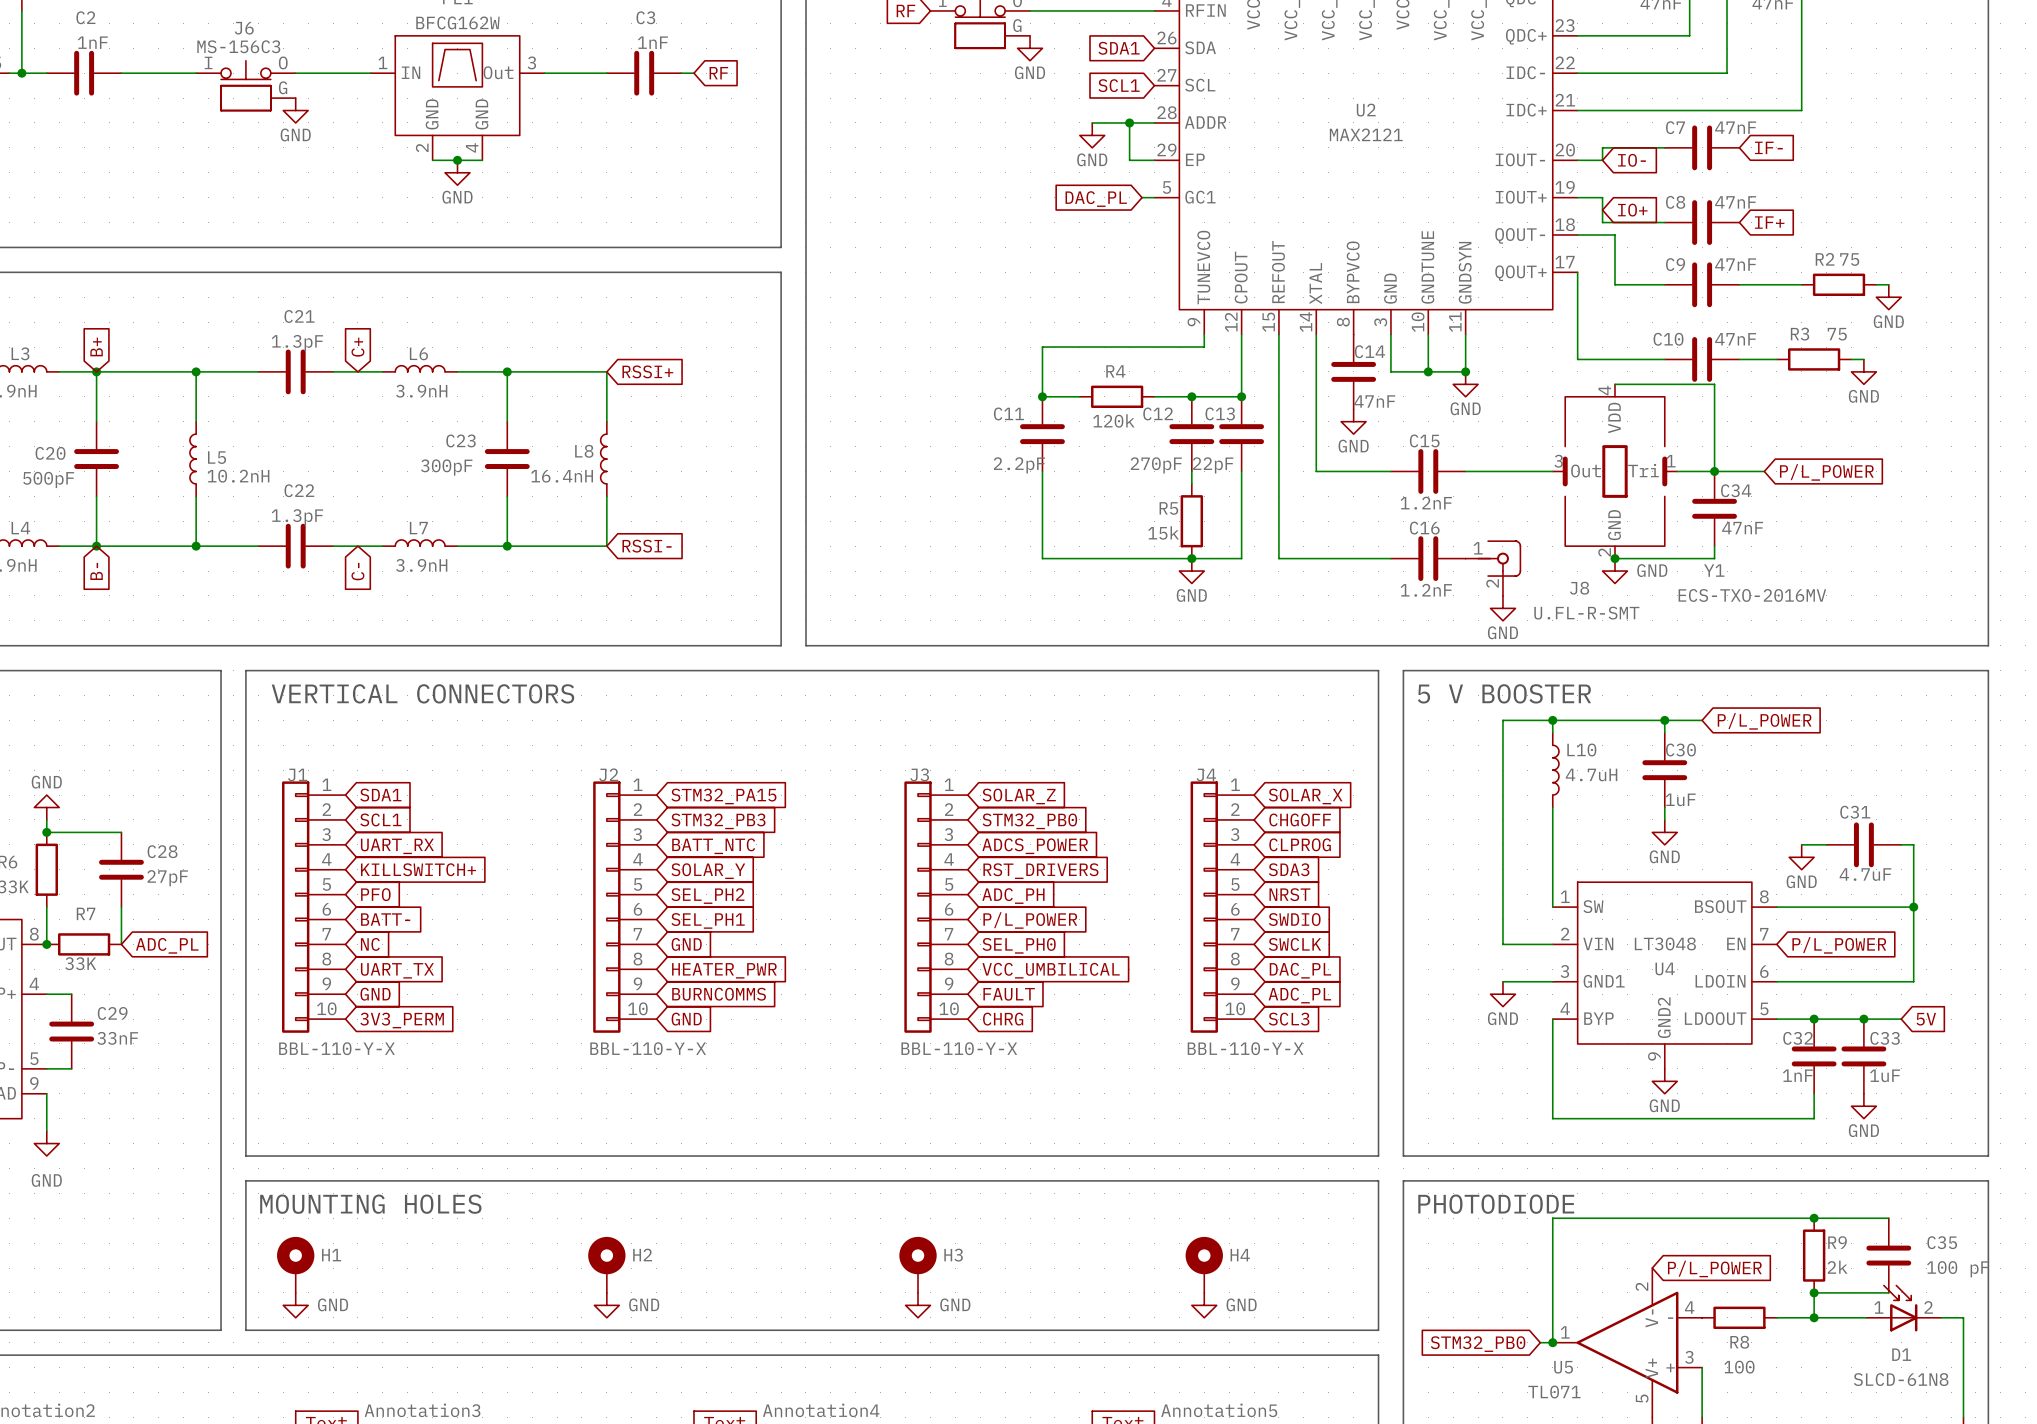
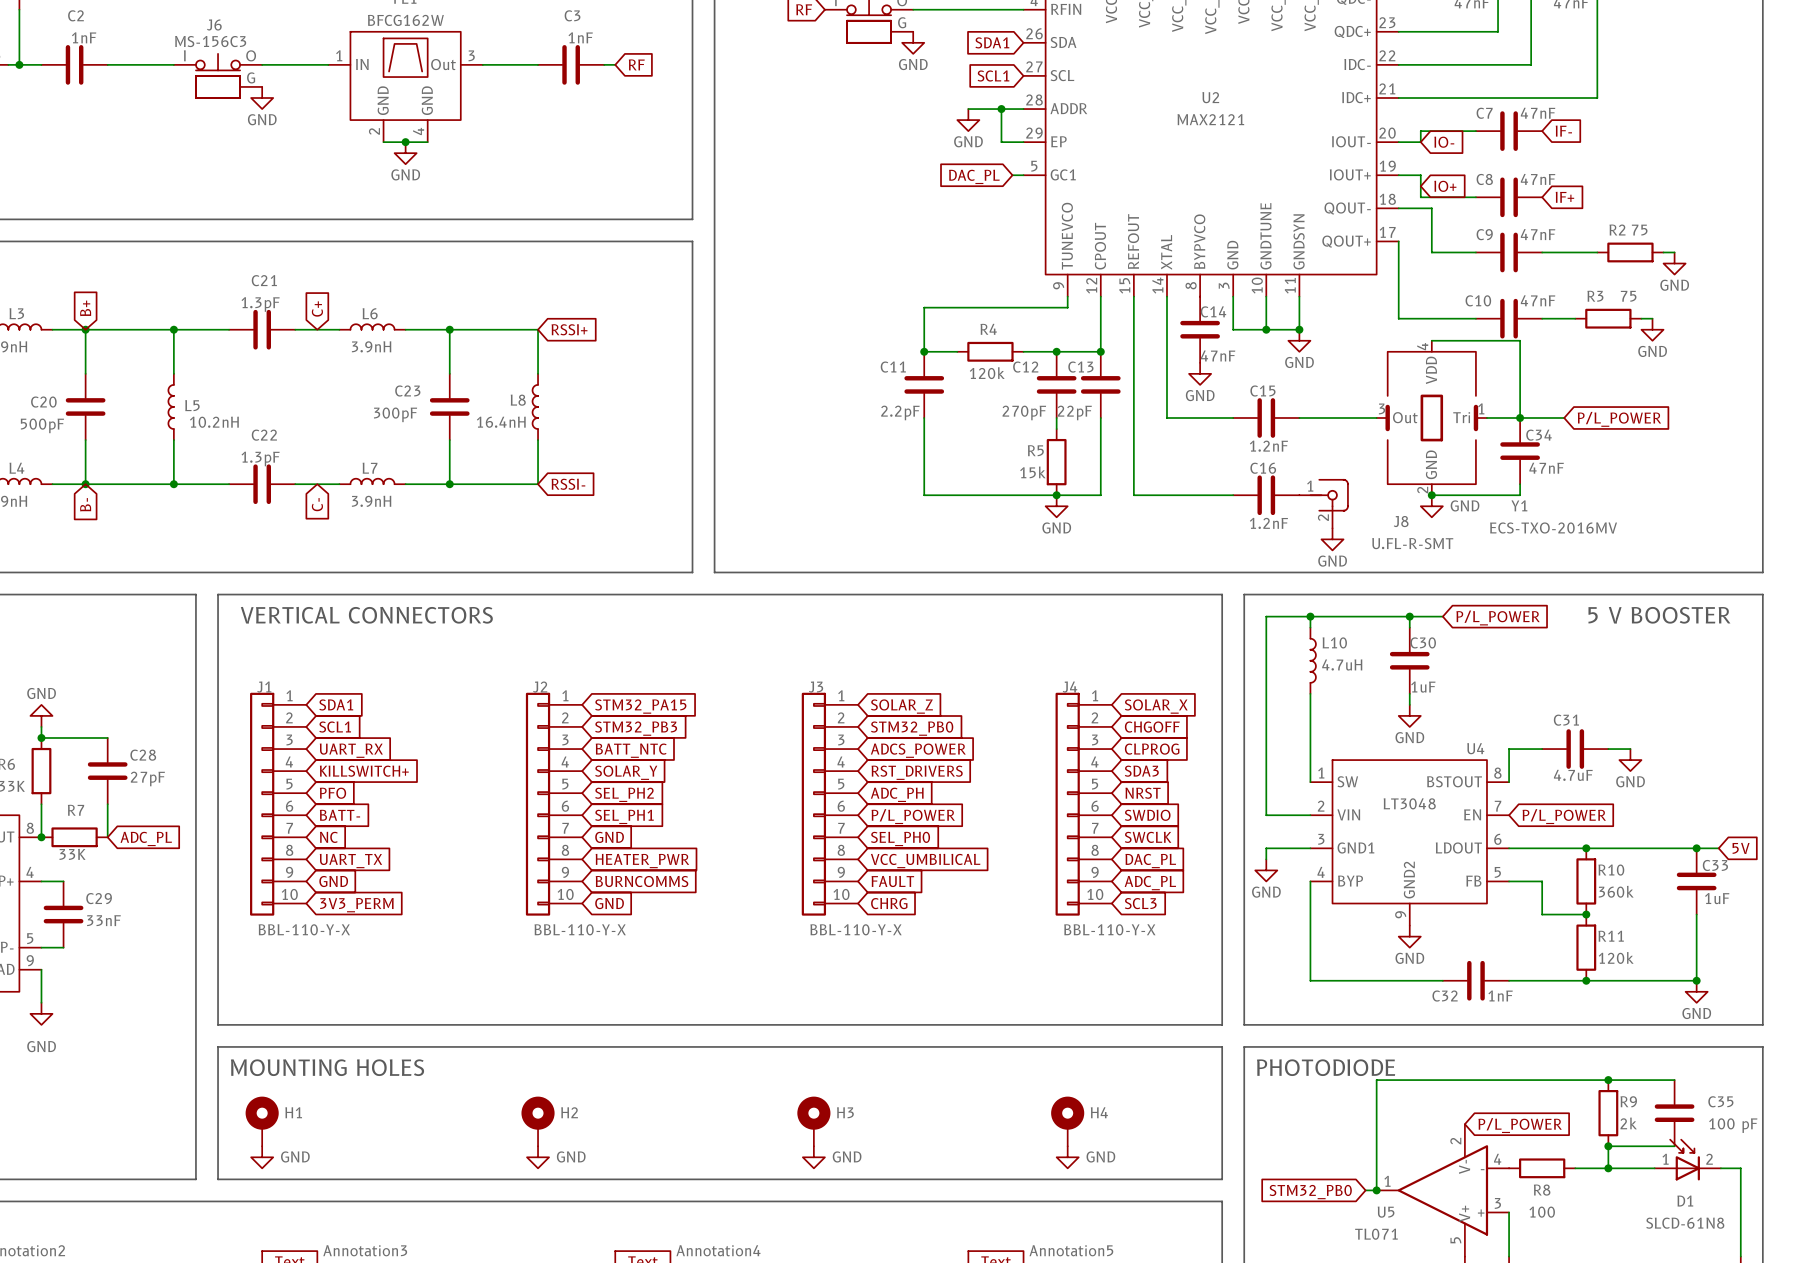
text: 5 V BOOSTER (1504, 693) -> none
text: none -> 5 V BOOSTER (1659, 615)
junction: none -> (1310, 616)
junction: none -> (1409, 616)
wire: (1552, 720) (1552, 732) -> (1310, 616) (1310, 627)
junction: (1552, 720) -> none
wire: (1664, 720) (1664, 732) -> (1409, 616) (1409, 627)
junction: (1664, 720) -> none
wire: (1702, 720) (1502, 720) (1502, 944) (1552, 944) -> (1442, 616) (1266, 616) (1266, 815) (1310, 815)
global label position: P/L_POWER (1764, 721) -> P/L_POWER (1498, 617)
L10 position: (1555, 770) -> (1313, 660)
C30 position: (1664, 770) -> (1409, 660)
wire: (1552, 807) (1552, 907) -> (1310, 693) (1310, 782)
wire: (1664, 807) (1664, 819) -> (1409, 693) (1409, 704)
power symbol position: GND (1664, 832) -> GND (1409, 715)
wire: none -> (1542, 749) (1509, 749) (1509, 782)
C31 position: (1863, 844) -> (1575, 749)
wire: (1901, 844) (1913, 844) (1913, 981) (1776, 981) -> none
power symbol position: GND (1801, 857) -> GND (1630, 760)
U4 pin name: BSOUT (1720, 906) -> BSTOUT (1454, 781)
wire: (1776, 907) (1913, 907) -> none
junction: (1913, 907) -> none
U4 value position: LT3048 (1665, 943) -> LT3048 (1409, 803)
global label position: P/L_POWER (1839, 945) -> P/L_POWER (1564, 816)
wire: none -> (1310, 848) (1266, 848) (1266, 859)
wire: none -> (1509, 848) (1718, 848)
junction: none -> (1586, 848)
junction: none -> (1696, 848)
U4 name position: U4 (1665, 968) -> U4 (1475, 748)
U4 position: (1664, 975) -> (1409, 842)
power symbol: none -> GND (1266, 870)
wire: (1502, 981) (1552, 981) -> none
U4 pin name: LDOIN (1720, 981) -> LDOUT (1458, 847)
wire: none -> (1310, 881) (1310, 980) (1442, 980)
power symbol: GND (1502, 994) -> none
wire: none -> (1509, 881) (1542, 881) (1542, 914) (1586, 914)
R10: none -> 360k (1586, 881)
U4 pin name: LDOOUT (1715, 1018) -> FB (1473, 881)
wire: (1552, 1019) (1552, 1118) (1814, 1118) (1814, 1093) -> none
wire: (1776, 1019) (1901, 1019) -> none
junction position: (1814, 1019) -> (1586, 914)
junction: (1863, 1019) -> none
global label position: 5V (1926, 1019) -> 5V (1741, 848)
wire: none -> (1696, 914) (1696, 980) (1509, 980)
C32 name position: C32 (1798, 1038) -> C32 (1445, 996)
power symbol: none -> GND (1409, 936)
C32 rotation: 0° (1814, 1056) -> 90° clockwise (1475, 980)
C32 position: (1814, 1056) -> (1475, 980)
C33 position: (1863, 1056) -> (1696, 881)
R11: none -> 120k (1586, 947)
C32 value position: 1nF (1797, 1075) -> 1nF (1500, 995)
power symbol: GND (1664, 1081) -> none
junction: none -> (1586, 980)
power symbol position: GND (1863, 1106) -> GND (1696, 991)
junction: none -> (1696, 980)

